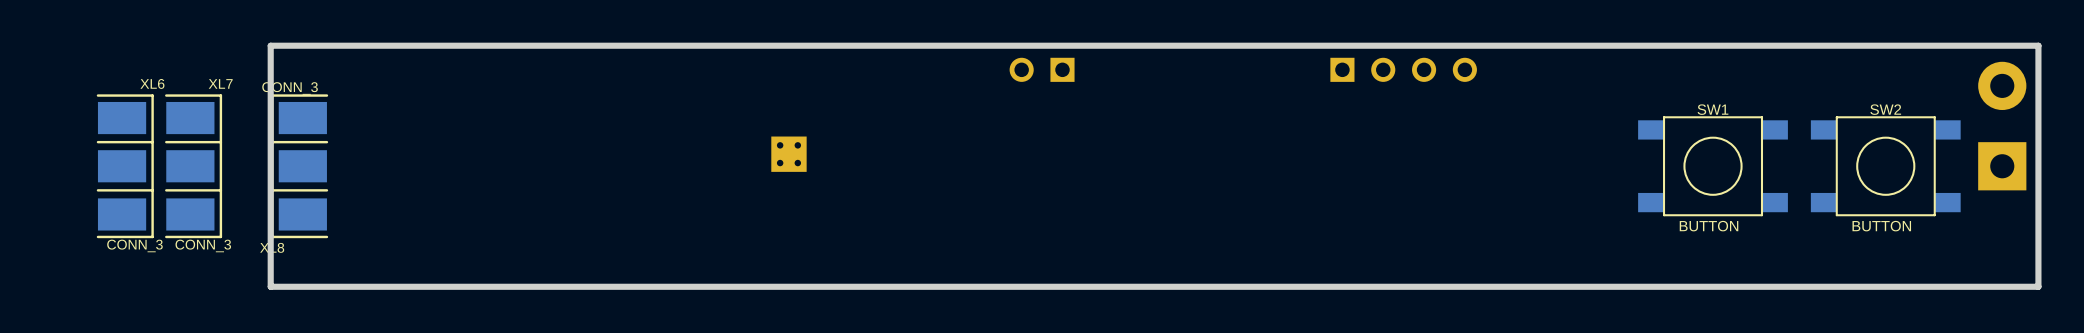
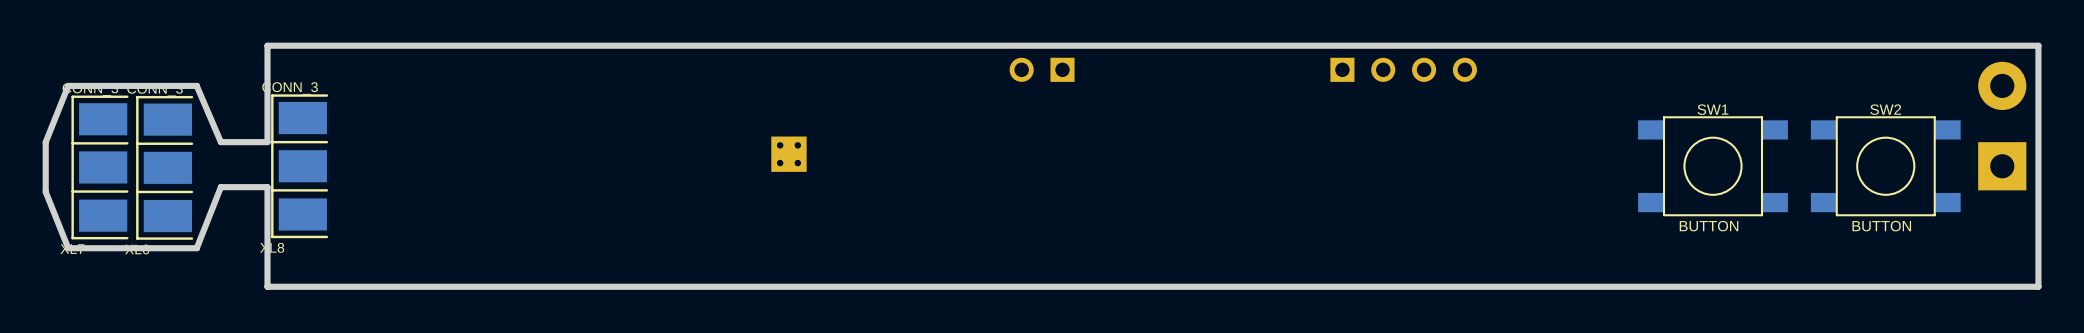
board edge: (270, 45) (270, 286) -> (270, 45) (267, 45) (267, 142) (220, 142) (196, 85) (68, 85) (45, 142) (45, 191) (68, 248) (196, 248) (220, 187) (267, 187) (267, 286) (270, 286)
XL6 rotation: 0° (125, 166) -> 180° (164, 167)
XL7 rotation: 0° (193, 166) -> 180° (99, 167)
XL7 position: (193, 166) -> (99, 167)

